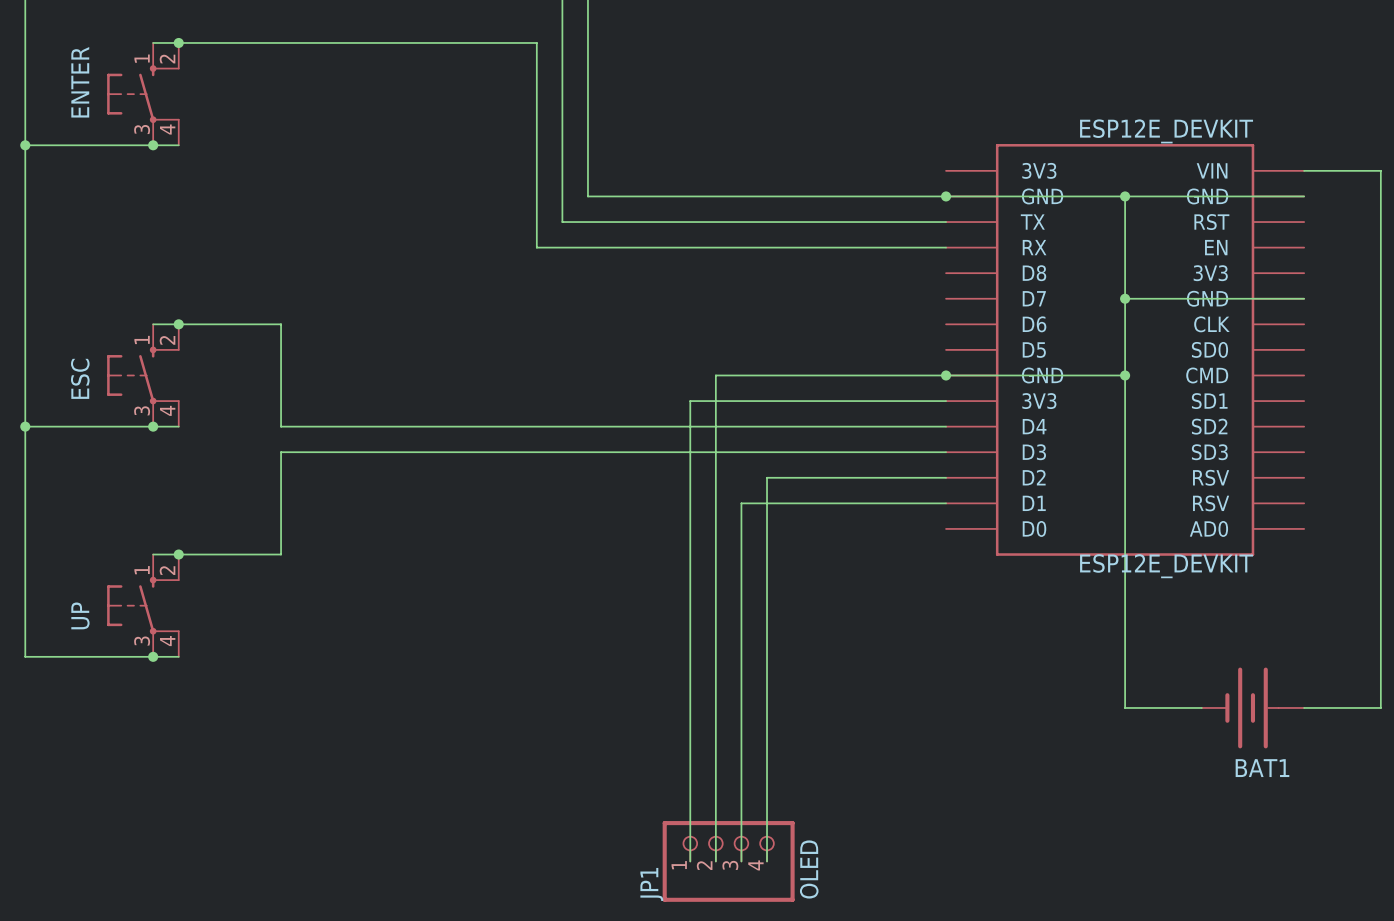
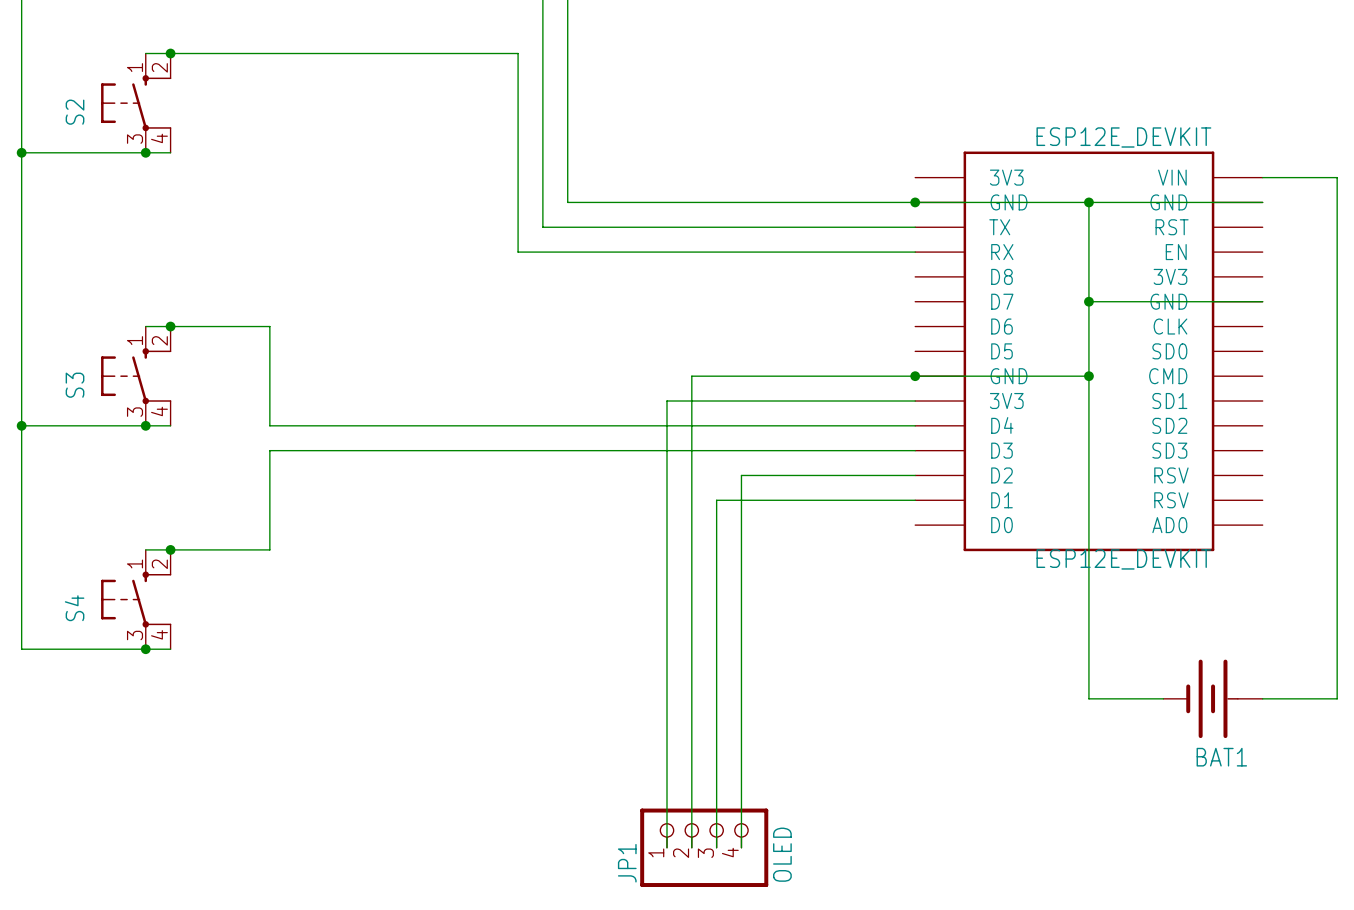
ENTER name: ENTER (80, 82) -> S2 (75, 112)
ESC name: ESC (80, 378) -> S3 (75, 385)
UP name: UP (80, 615) -> S4 (74, 608)

